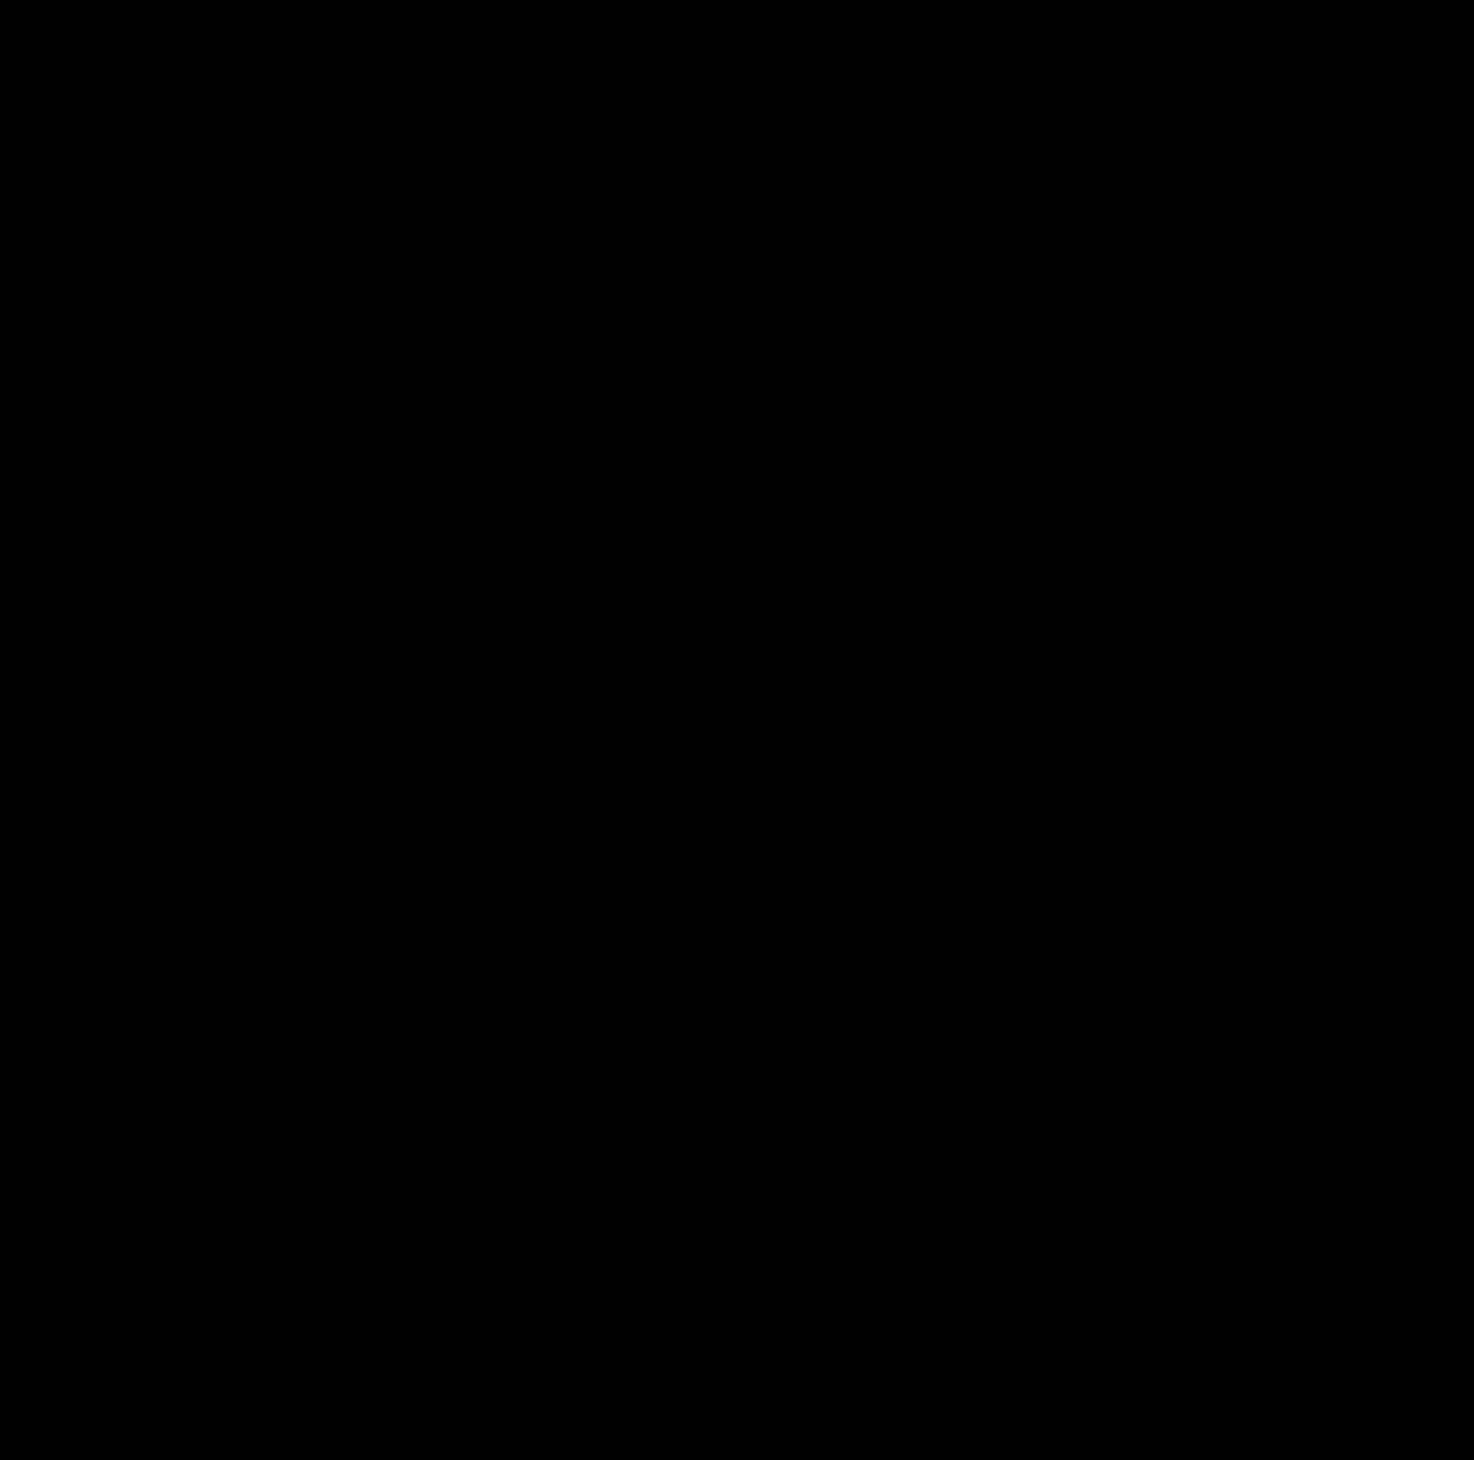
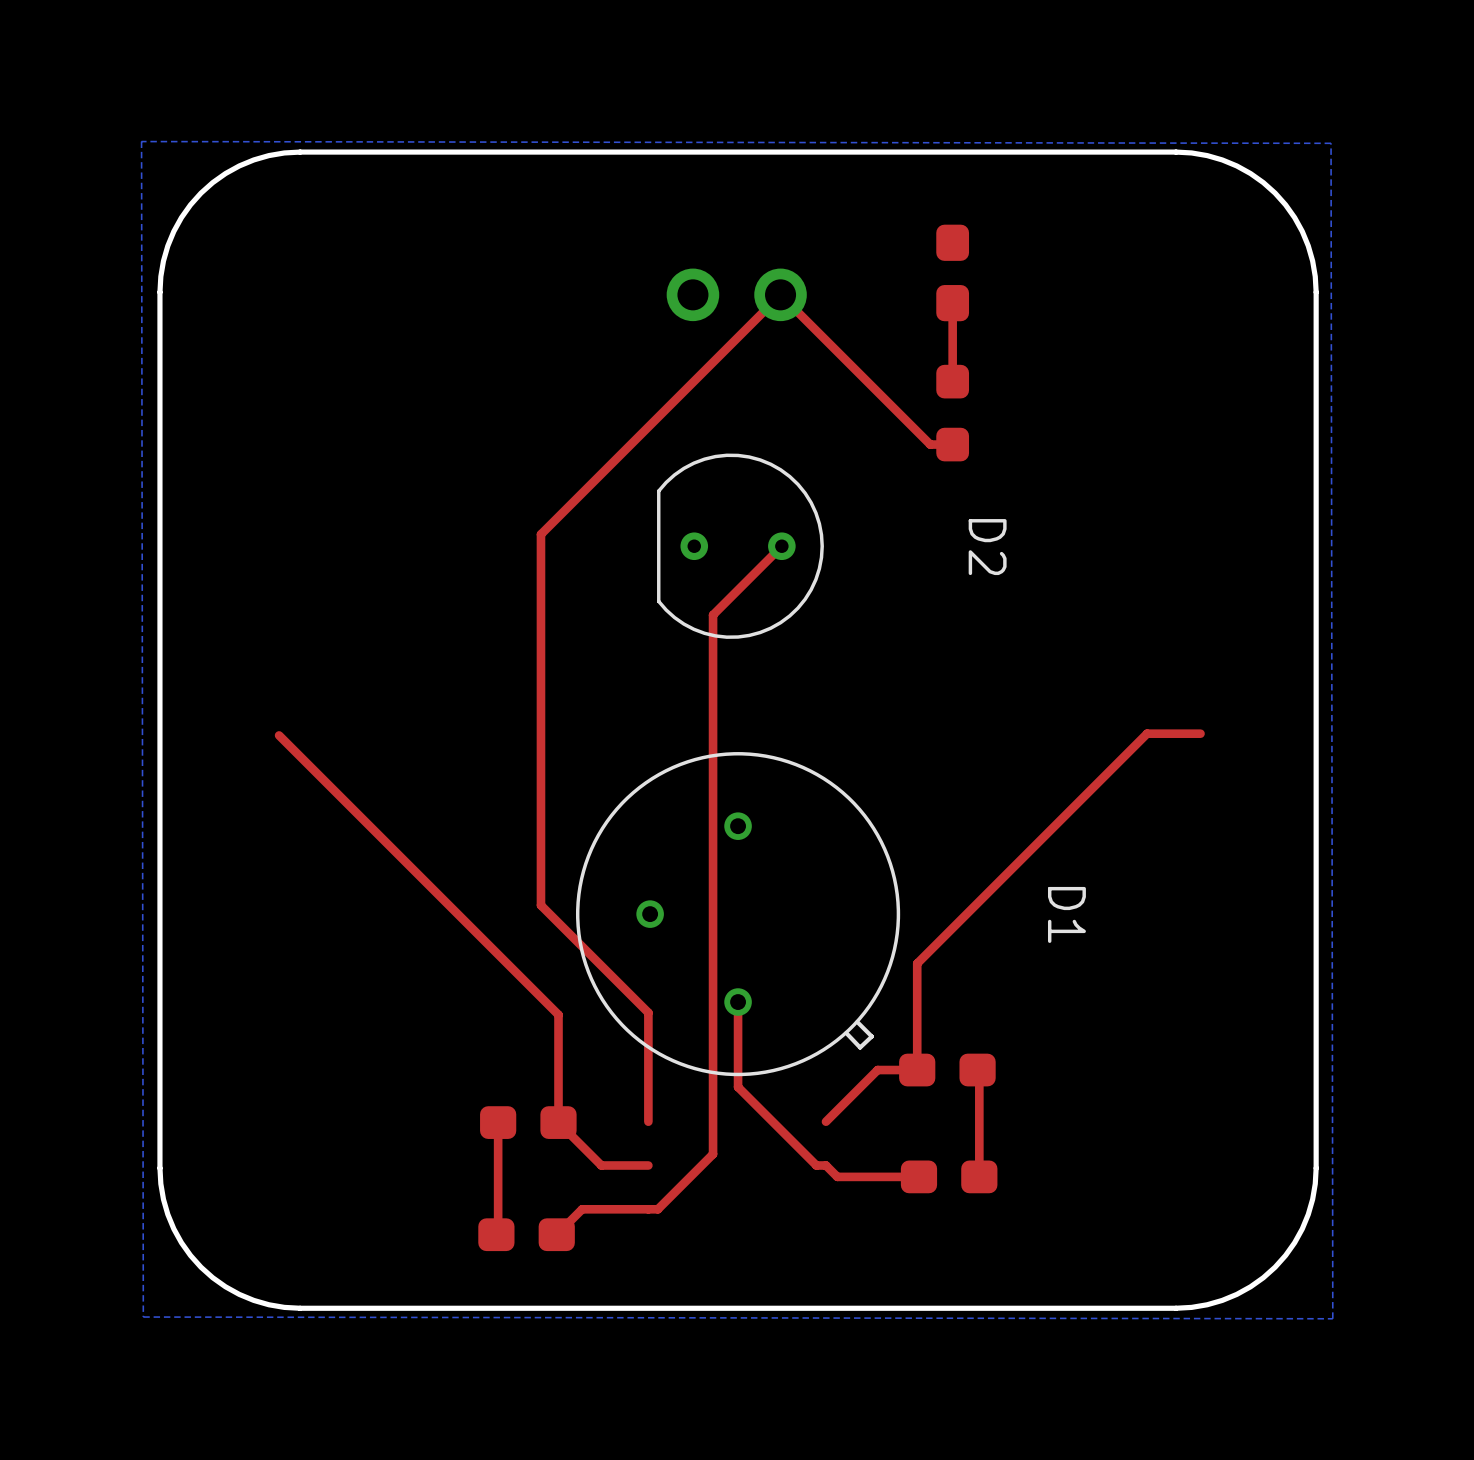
bottom zone outline: none -> (141, 141) (1331, 143) (1332, 1318) (143, 1317) (141, 141)
board edge: none -> (1176, 152) (300, 152) (268, 155) (239, 165) (212, 182) (190, 204) (173, 231) (167, 245) (163, 261) (159, 292) (159, 1168) (163, 1199) (173, 1228) (190, 1255) (212, 1277) (239, 1294) (253, 1300) (268, 1304) (300, 1308) (1176, 1308) (1207, 1304) (1236, 1294) (1263, 1277) (1285, 1255) (1302, 1228) (1308, 1214) (1315, 1183) (1316, 1168) (1315, 276) (1312, 261) (1302, 231) (1285, 204) (1275, 193) (1263, 182) (1236, 165) (1207, 155) (1176, 152)
part: none -> (952, 272)
part: none -> (736, 294)
top track: none -> (952, 303) (952, 381)
part: none -> (952, 413)
top track: none -> (952, 444) (930, 444) (780, 294) (540, 534) (540, 905) (648, 1012) (648, 1121)
D2: none -> (740, 546)
top track: none -> (781, 546) (713, 615) (713, 1154) (657, 1209) (582, 1209) (556, 1234)
top track: none -> (1200, 733) (1147, 733) (917, 963) (917, 1070) (877, 1070) (825, 1121)
top track: none -> (279, 735) (558, 1014) (558, 1122) (601, 1165) (648, 1165)
D1: none -> (738, 914)
top track: none -> (738, 1002) (738, 1087) (816, 1165) (825, 1165) (837, 1176) (918, 1176)
part: none -> (947, 1070)
top track: none -> (977, 1070) (979, 1071) (979, 1176)
top track: none -> (498, 1122) (498, 1232) (496, 1234)
part: none -> (528, 1122)
part: none -> (949, 1176)
part: none -> (526, 1234)

